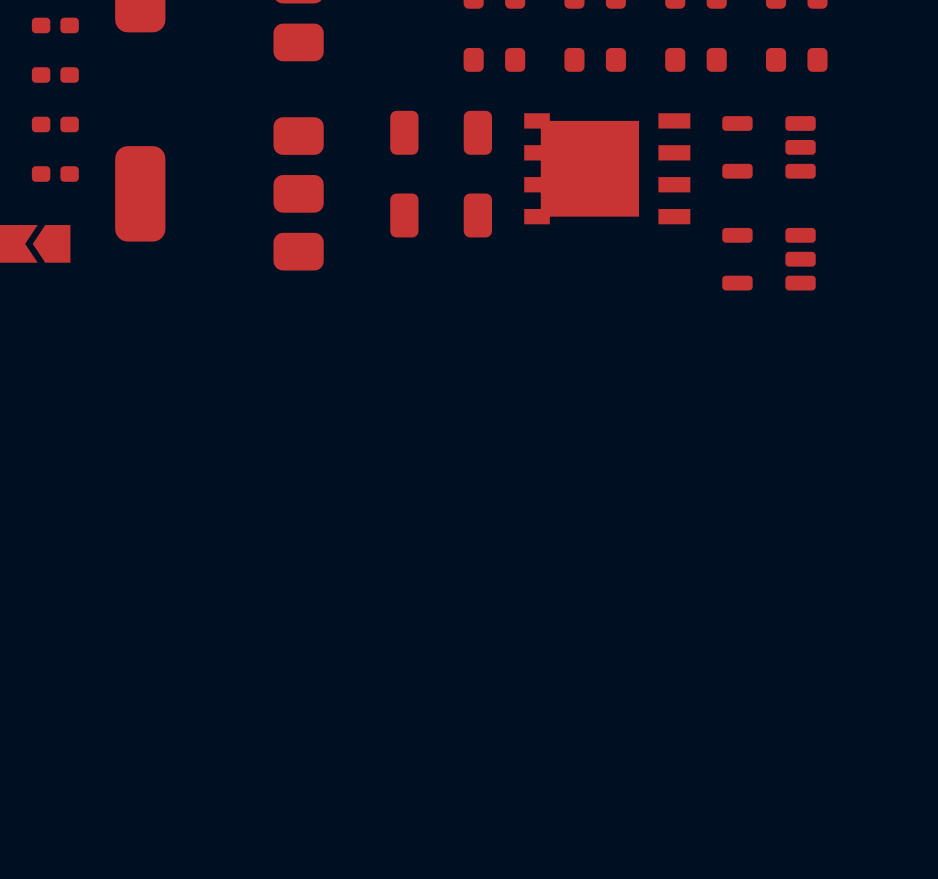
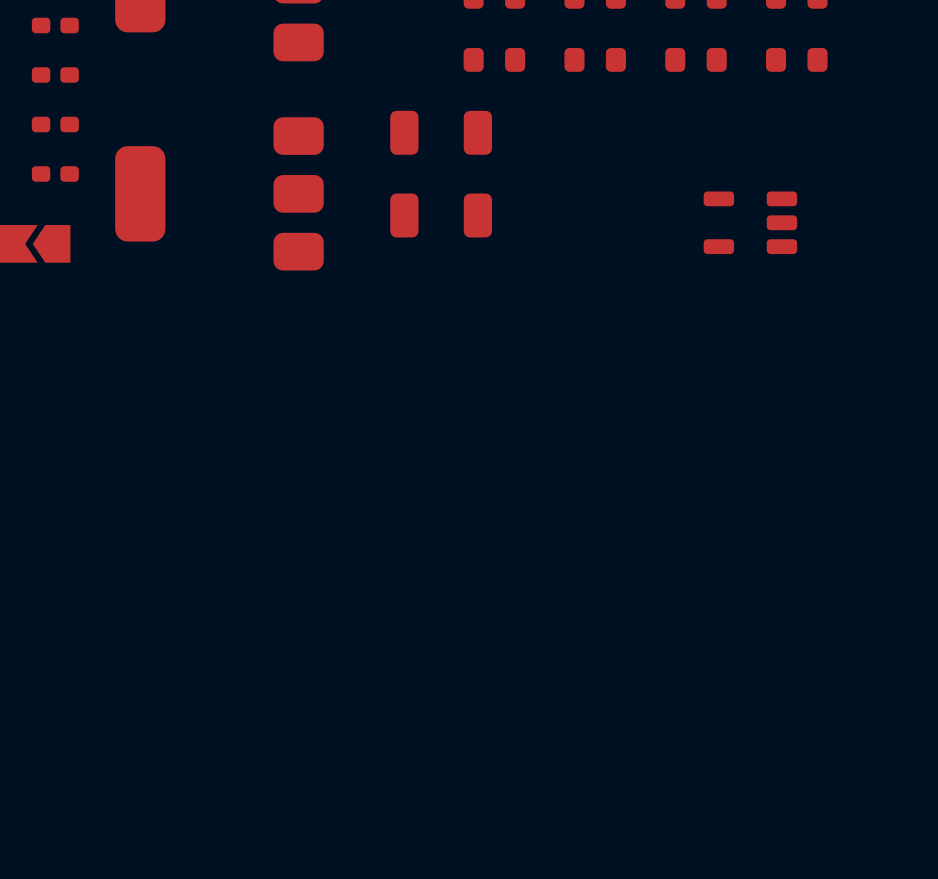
part: (768, 147) -> none
part: (607, 168) -> none
part: none -> (750, 222)
part: (768, 259) -> none

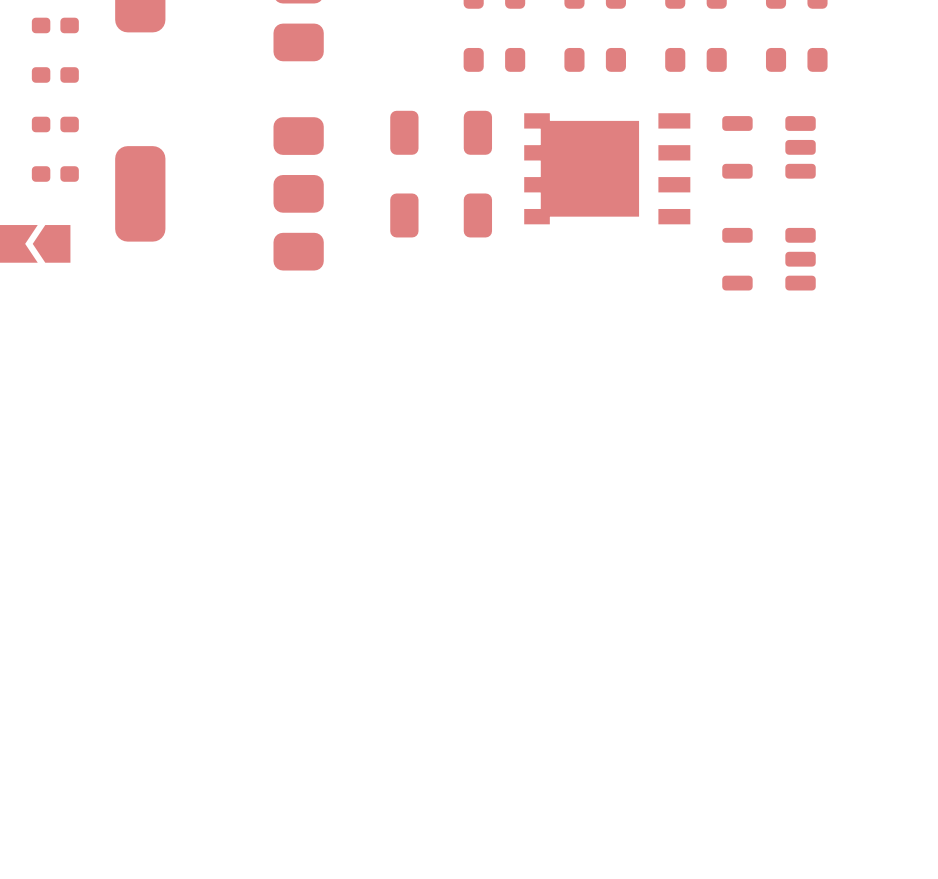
part: none -> (768, 147)
part: none -> (607, 168)
part: (750, 222) -> none
part: none -> (768, 259)

